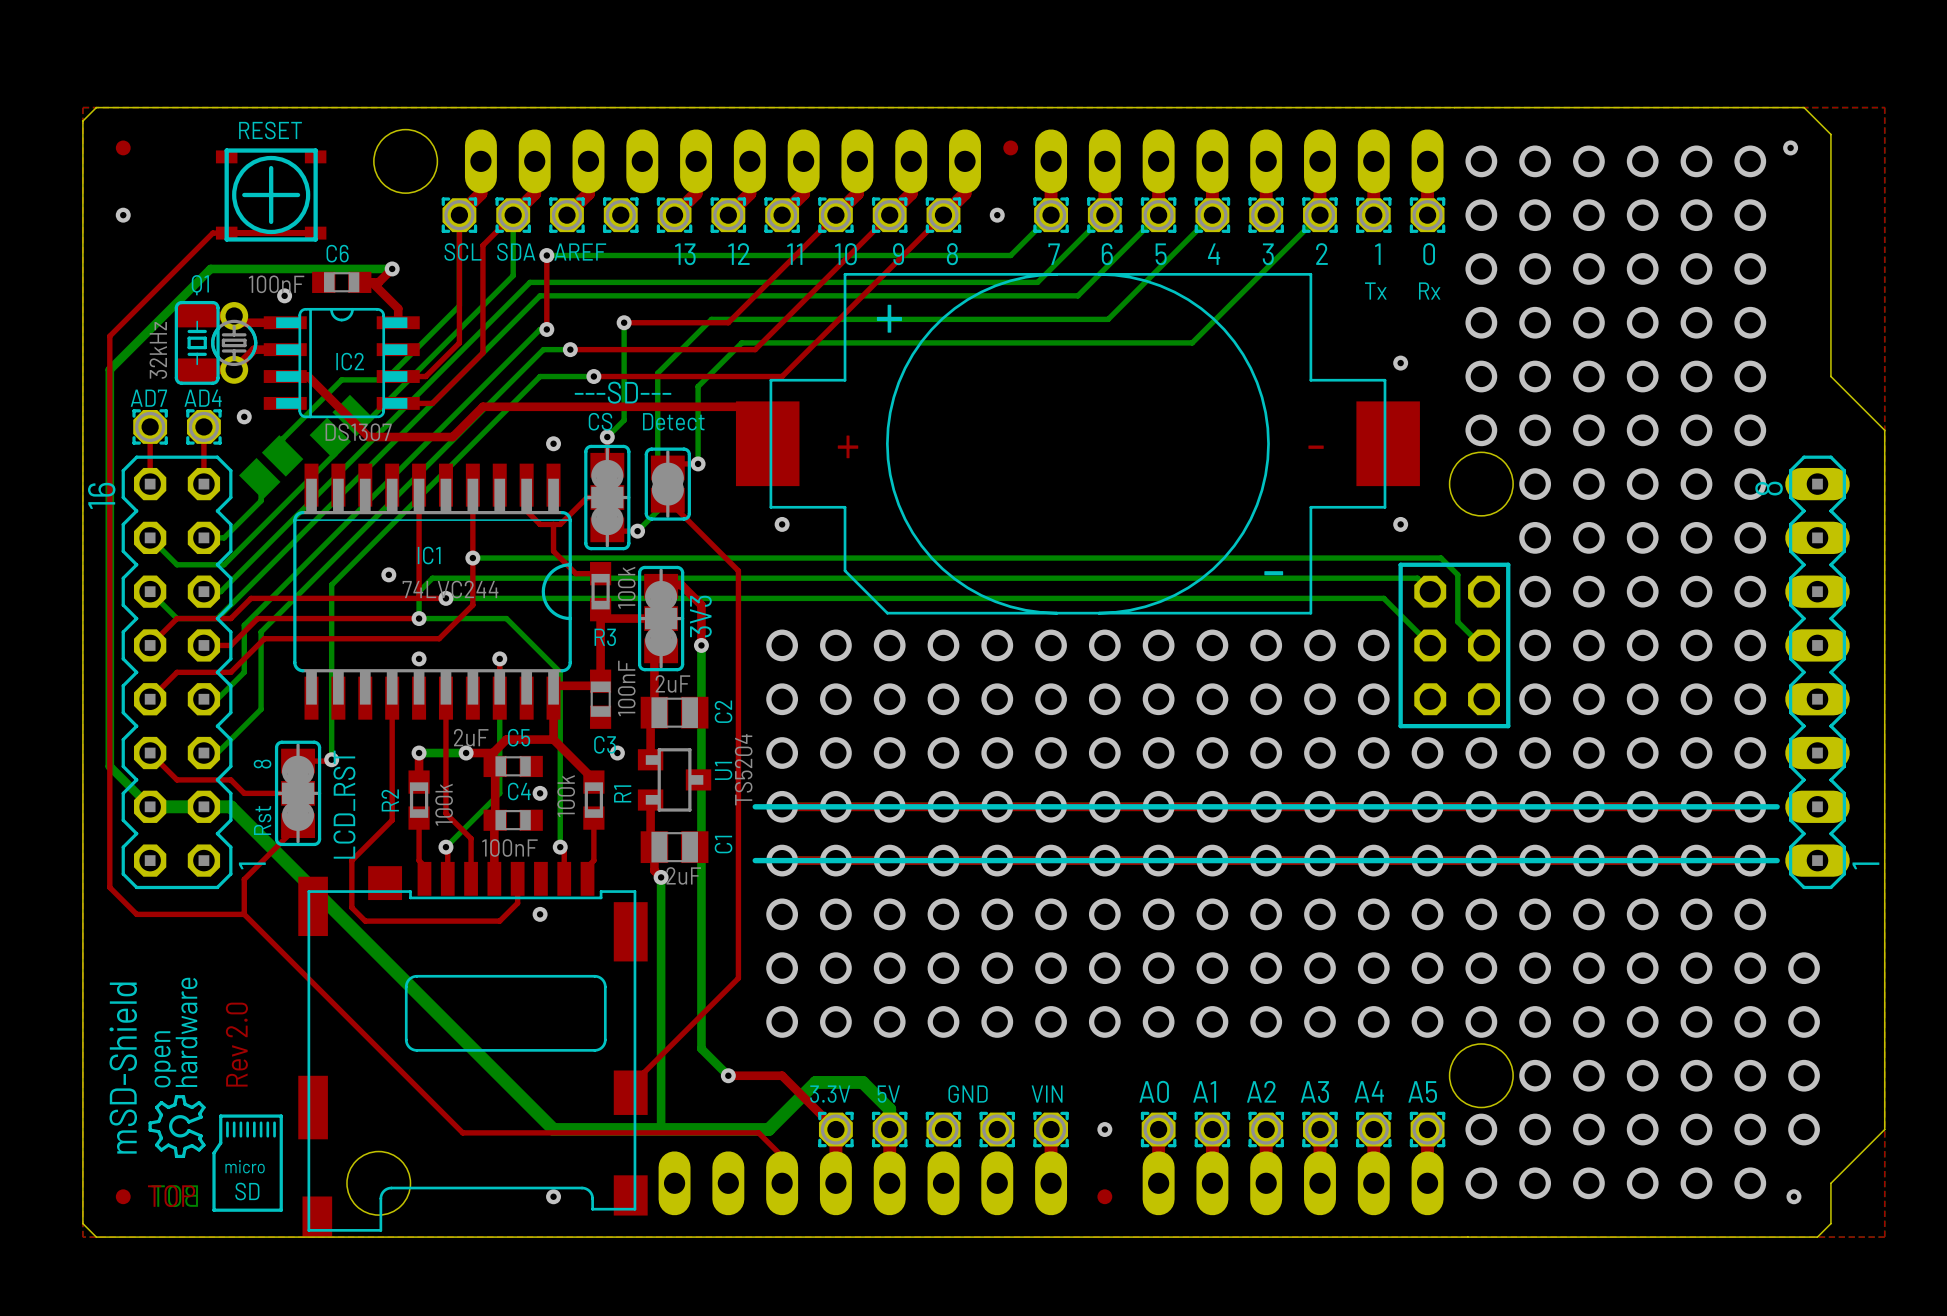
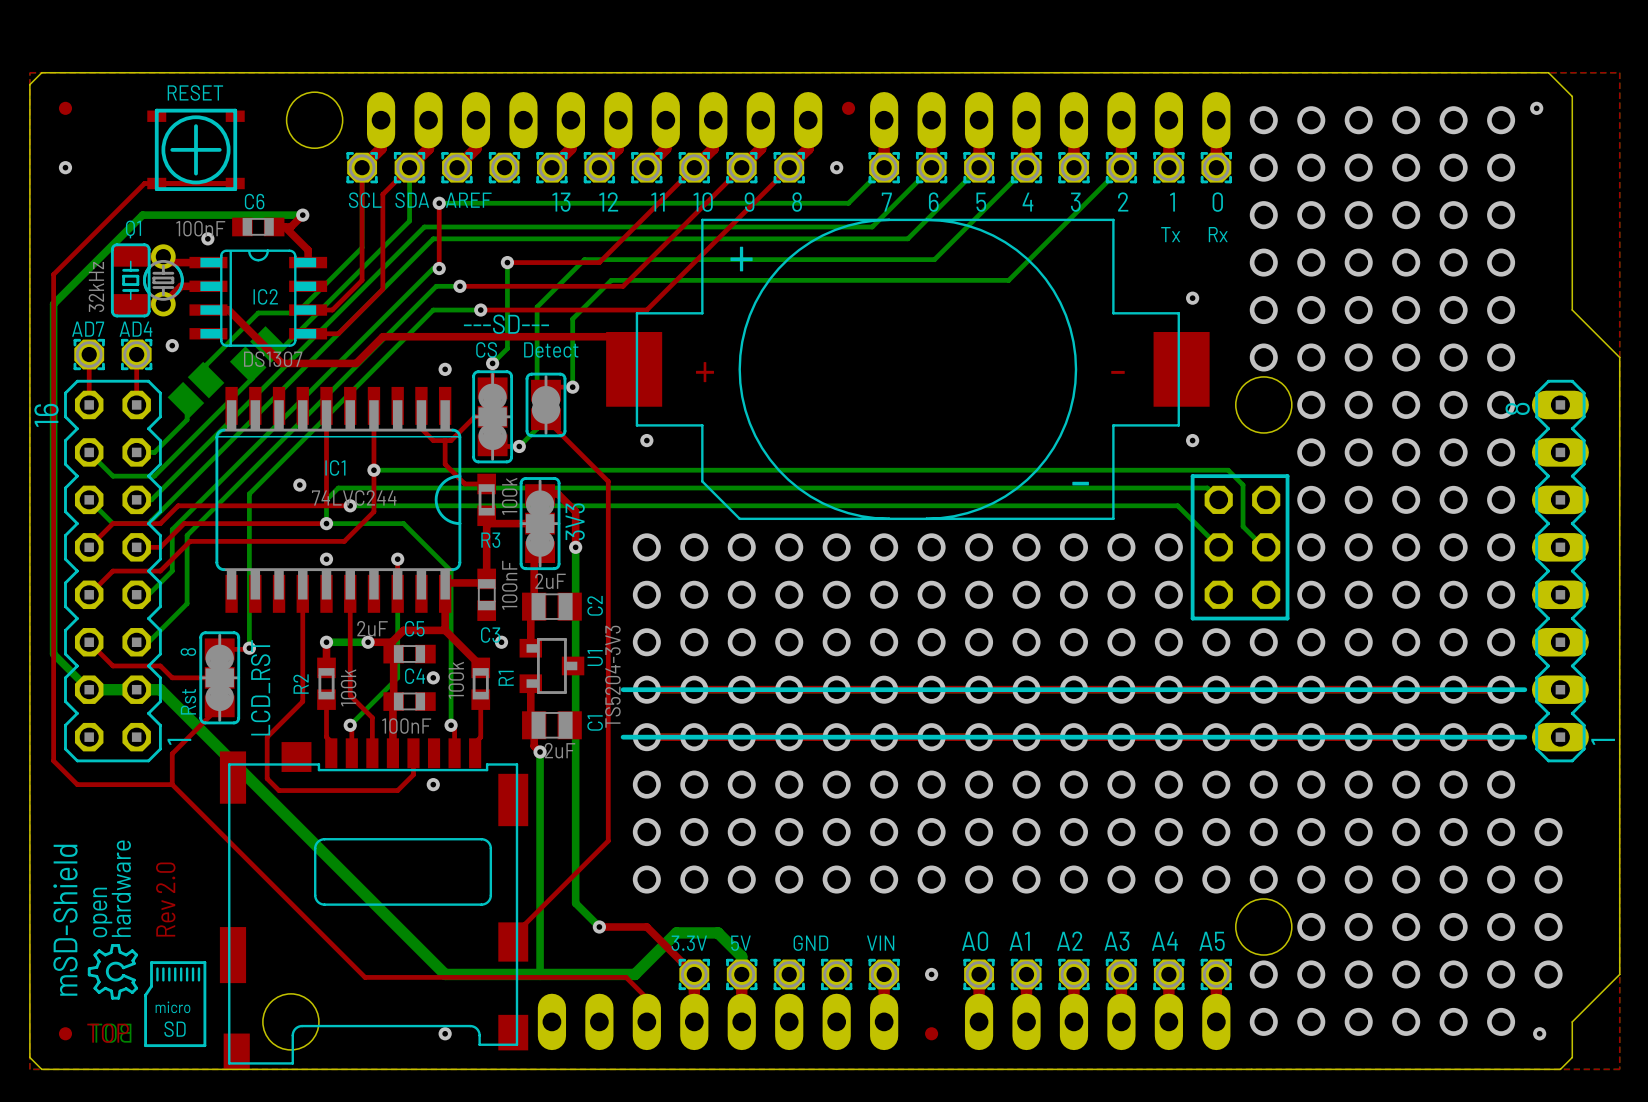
U1 value: TS5204 (743, 769) -> TS5204-3V3 (612, 676)

